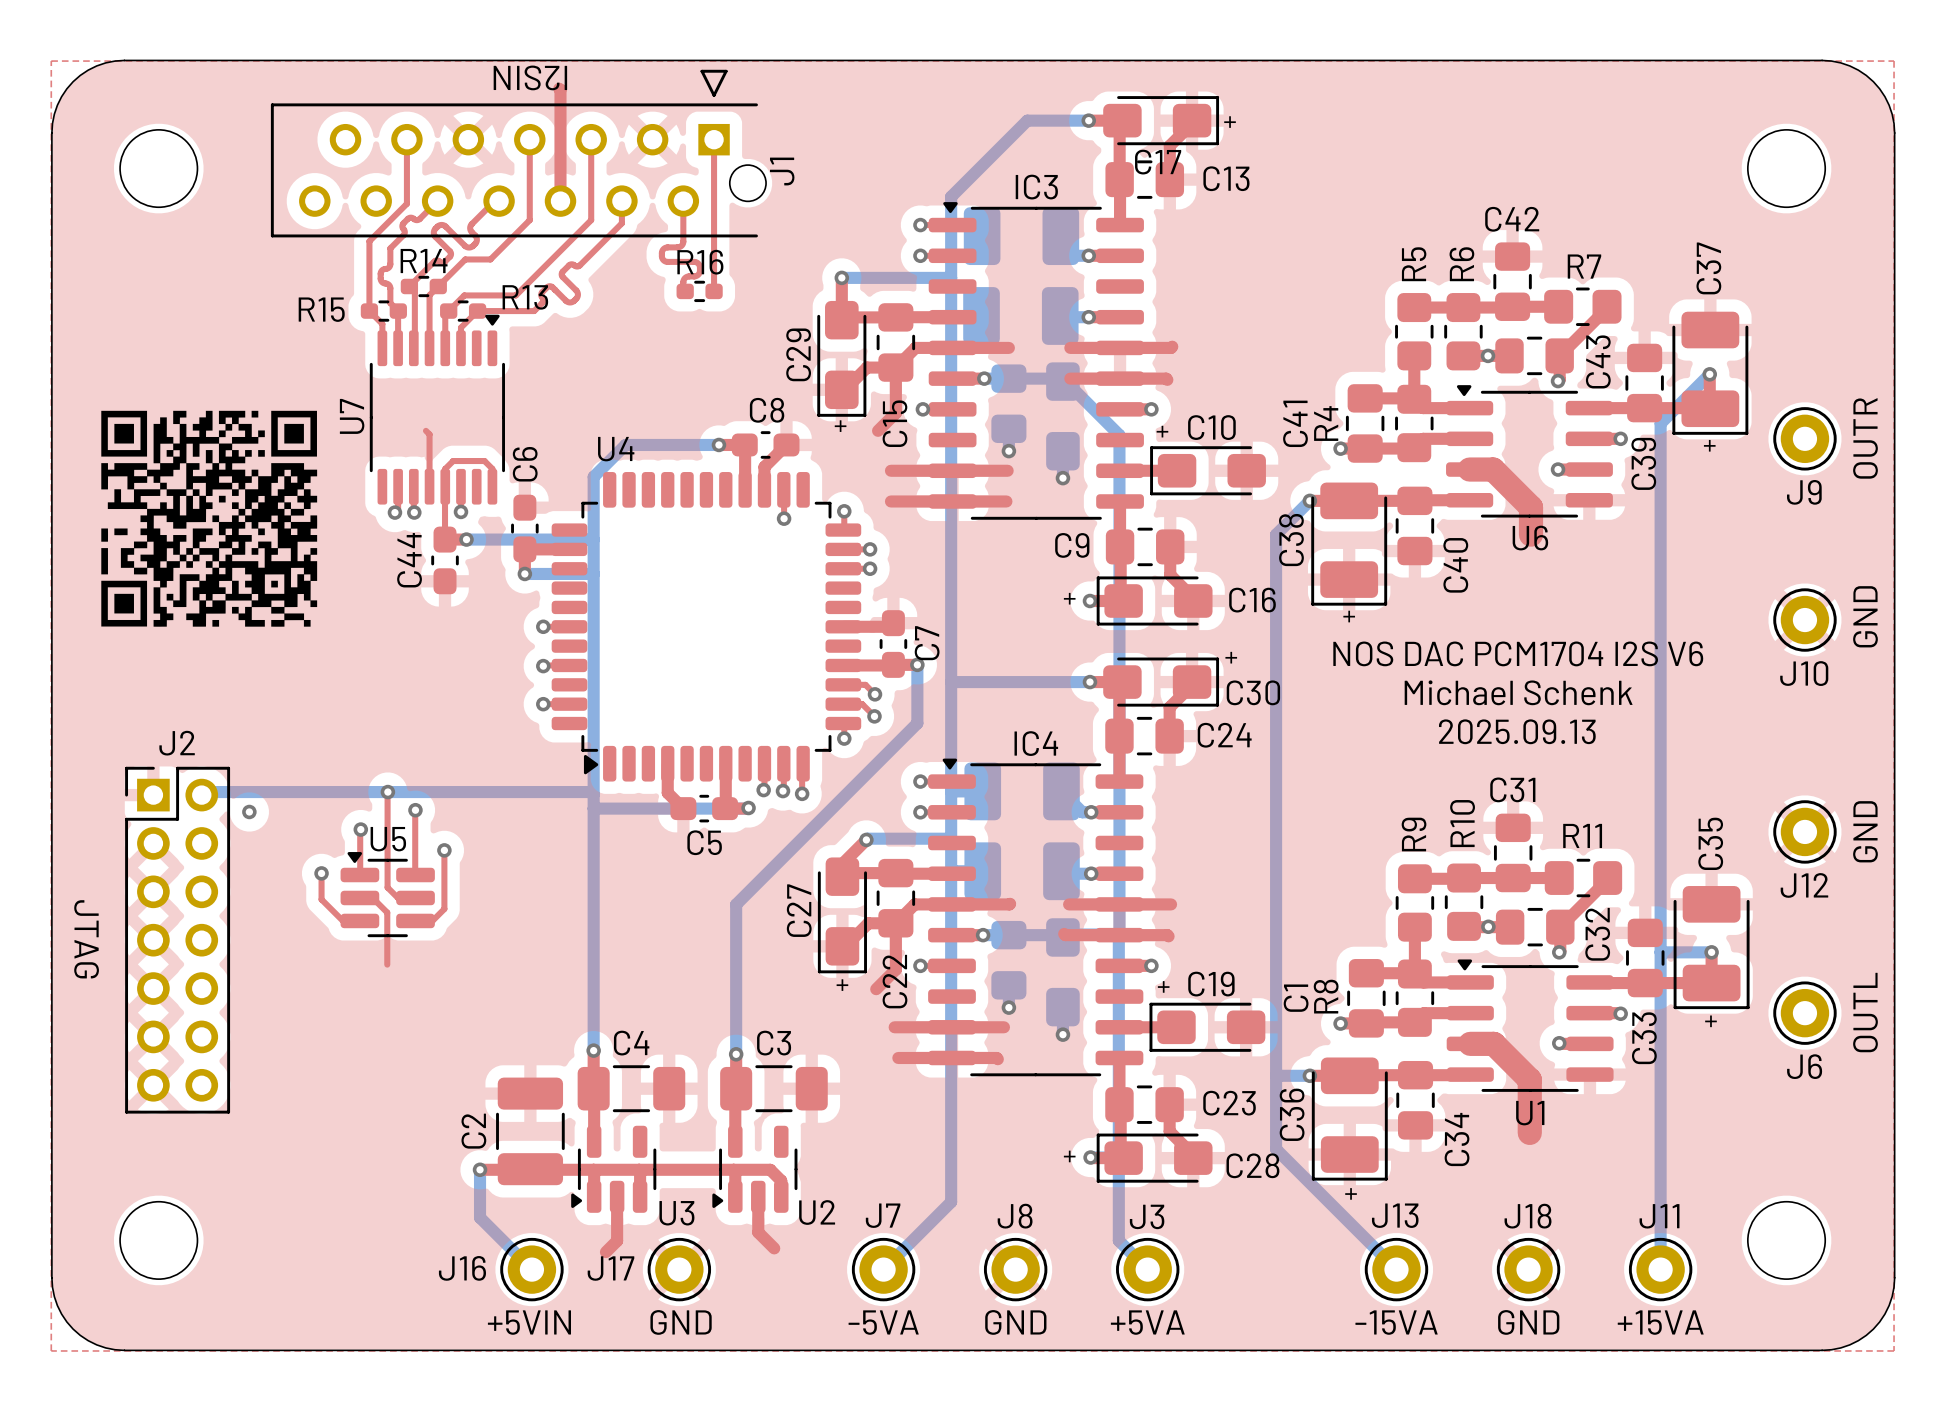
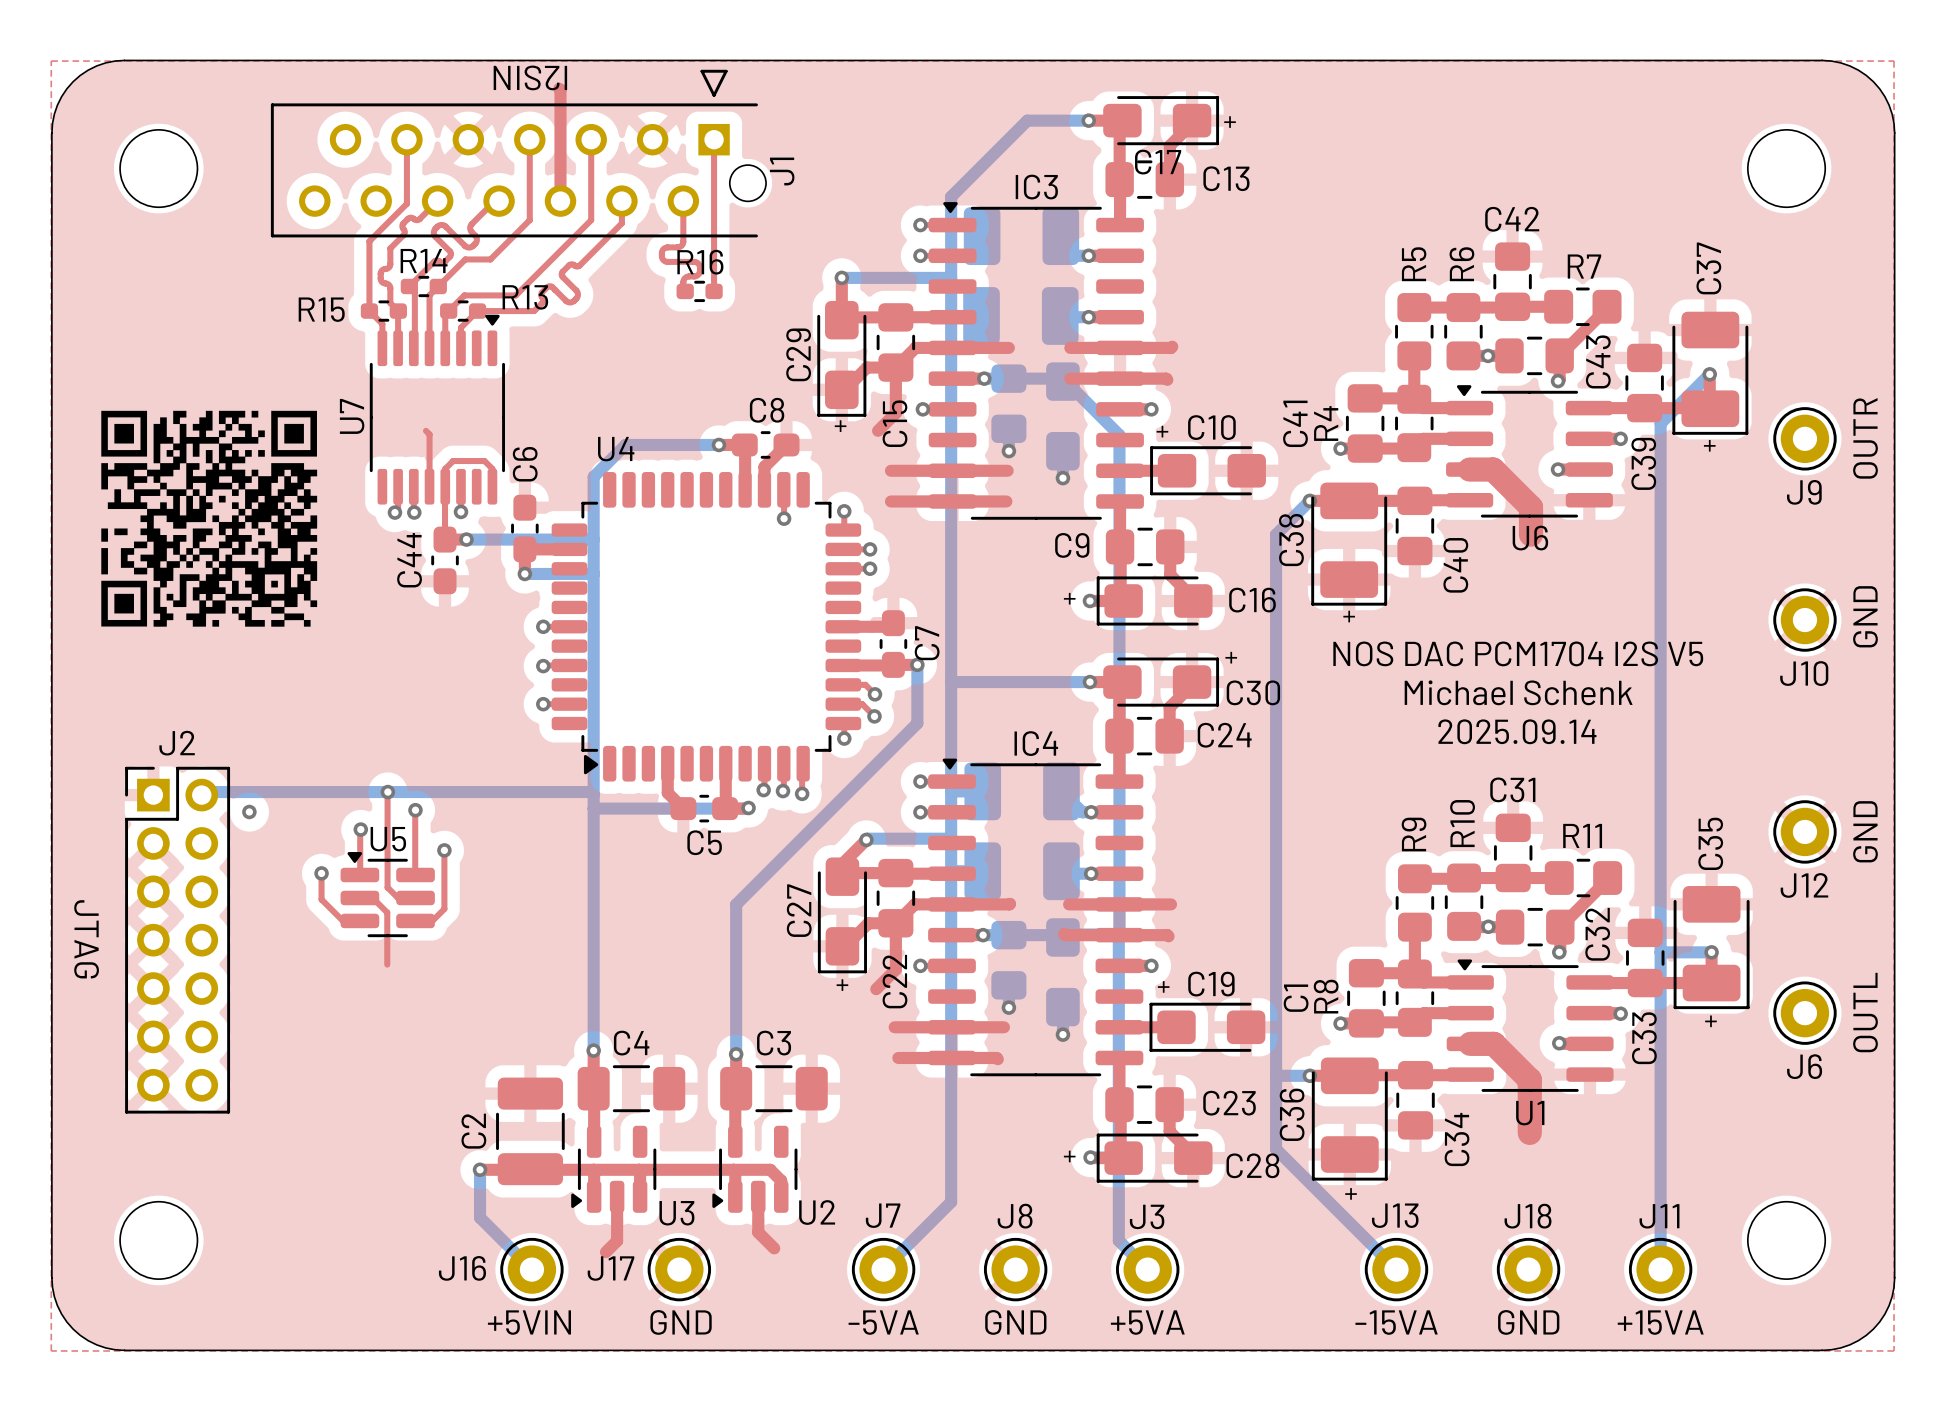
text: NOS DAC PCM1704 I2S V6 (1518, 653) -> NOS DAC PCM1704 I2S V5 (1518, 653)
text: 2025.09.13 (1517, 731) -> 2025.09.14 (1517, 731)

